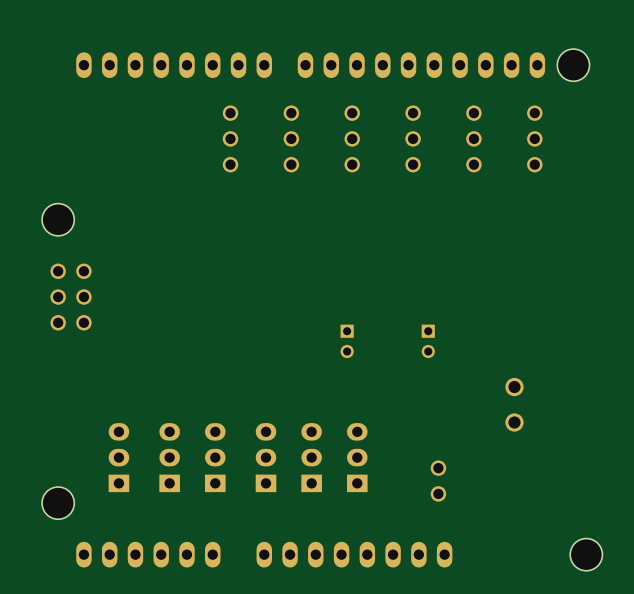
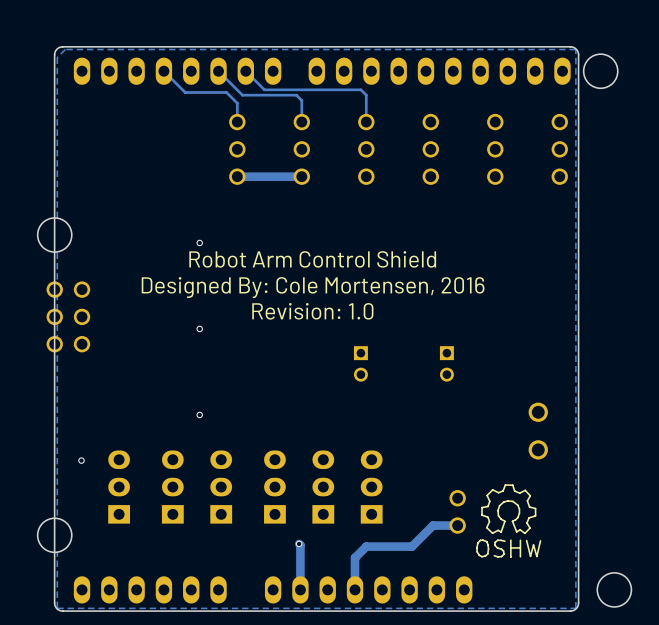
board edge: none -> (570, 46) (62, 46) (56, 49) (54, 54) (54, 603) (56, 608) (62, 611) (570, 611) (576, 608) (578, 603) (578, 54) (576, 49) (570, 46)
zone outline: none -> (575, 49) (575, 608) (57, 608) (57, 57) (65, 49) (575, 49)
track: none -> (163, 71) (185, 92) (226, 92) (237, 103) (237, 122)
track: none -> (218, 71) (242, 95) (296, 95) (301, 100) (301, 122)
track: none -> (245, 71) (264, 89) (360, 89) (366, 95) (366, 122)
track: none -> (301, 176) (237, 176)
via: none -> (199, 242)
text: none -> Robot Arm Control Shield (312, 259)
text: none -> Designed By: Cole Mortensen, 2016 (313, 287)
text: none -> Revision: 1.0 (312, 311)
via: none -> (199, 328)
via: none -> (199, 414)
via: none -> (81, 460)
drawing: none -> [476, 484, 542, 558]
track: none -> (457, 525) (433, 525) (411, 546) (366, 546) (355, 557) (355, 589)
track: none -> (299, 543) (300, 589)
via: none -> (299, 543)

